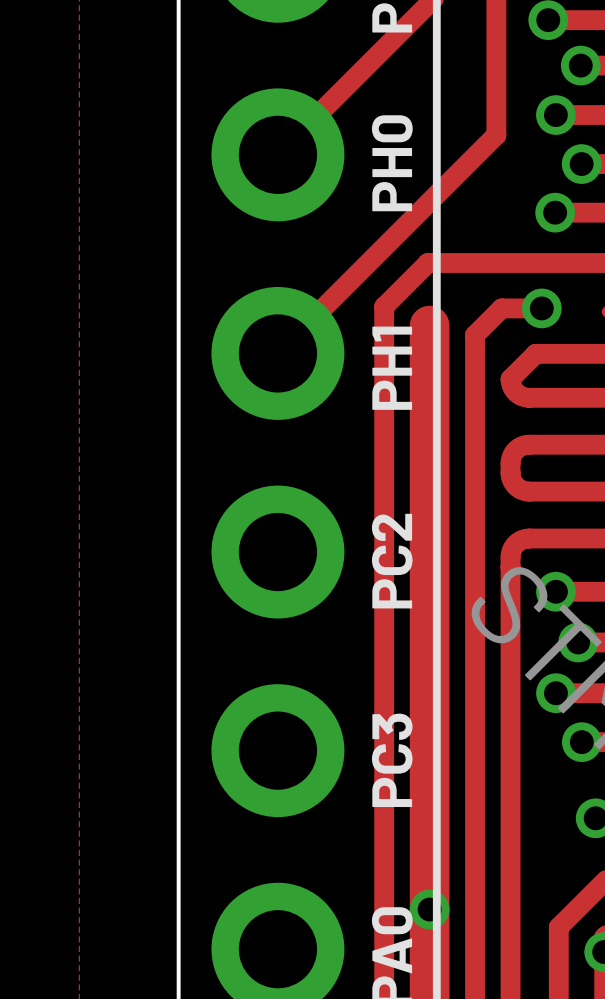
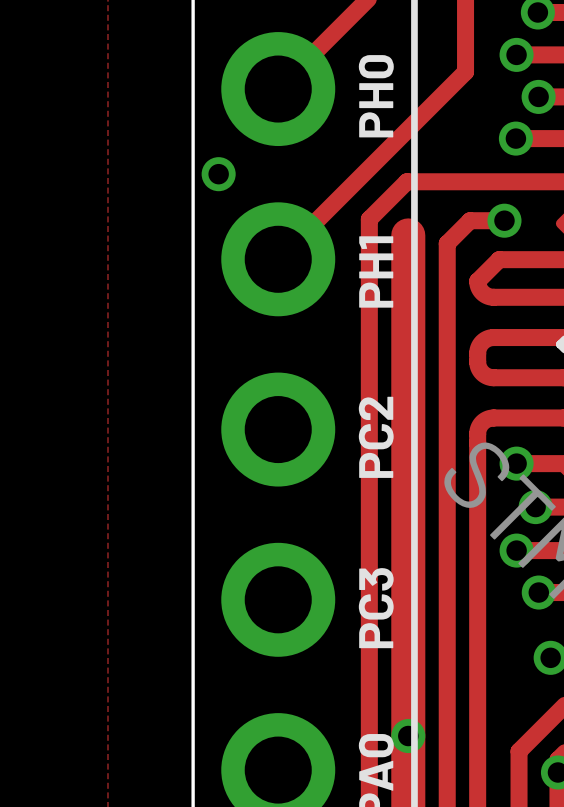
via: none -> (218, 174)

